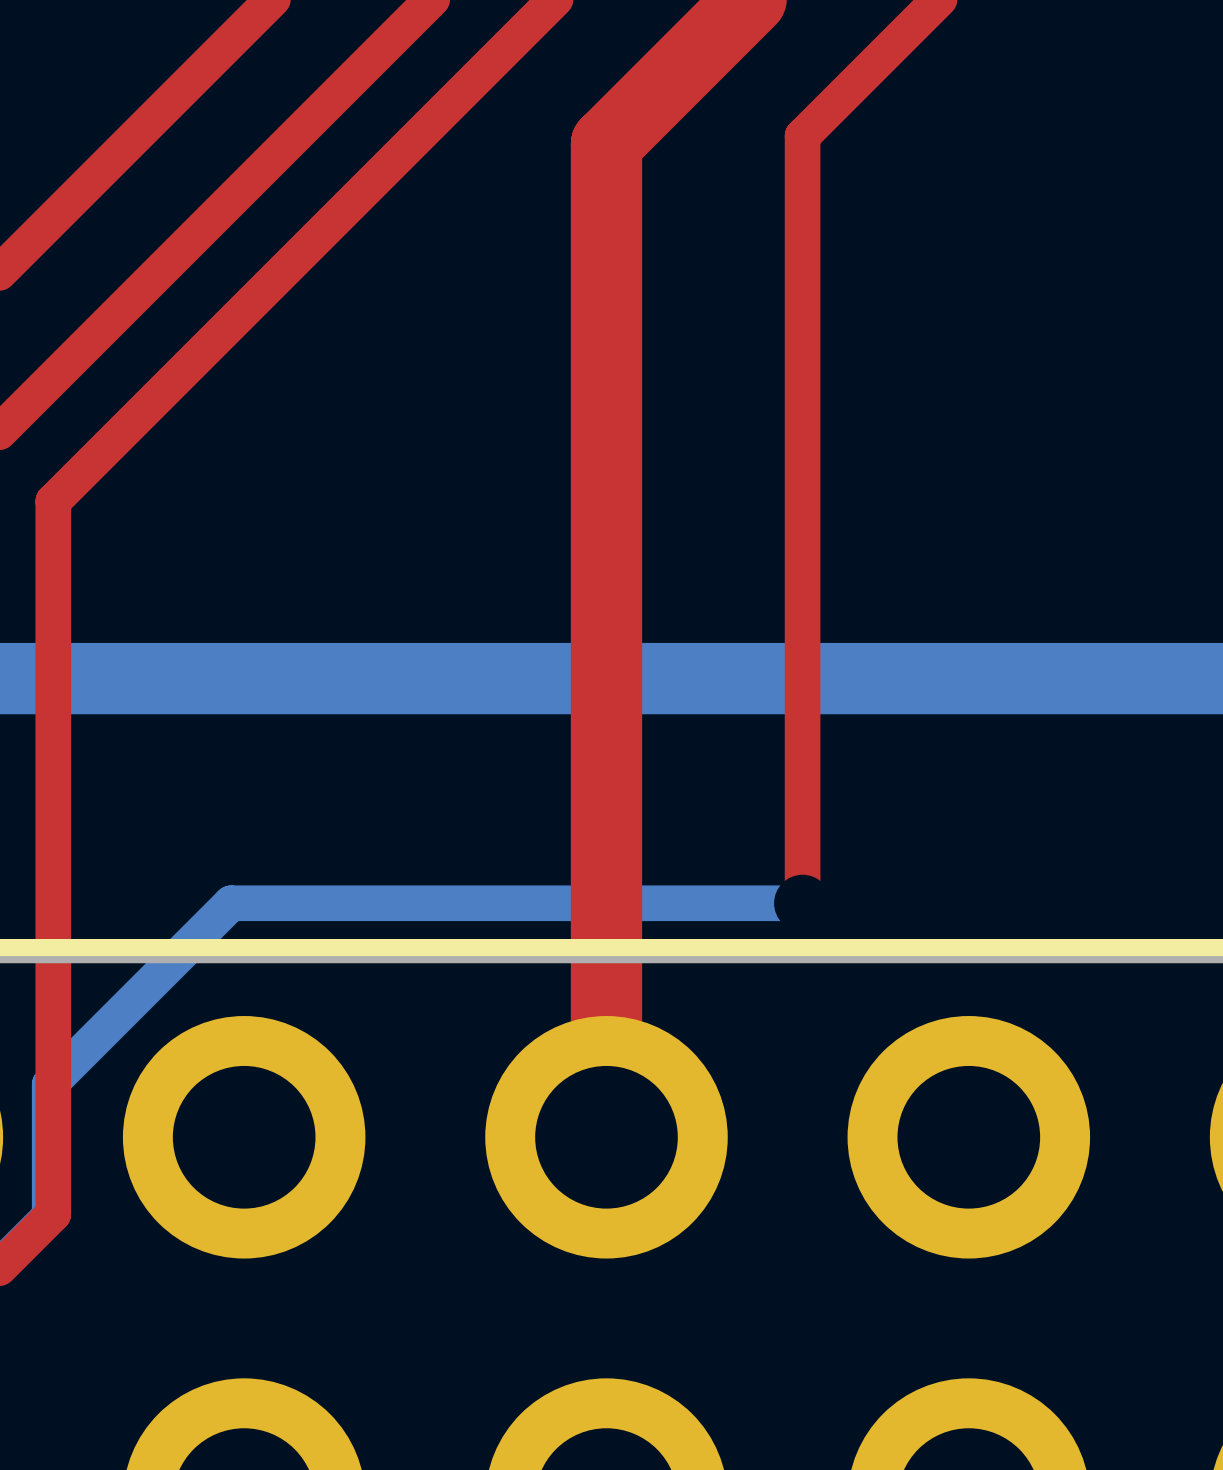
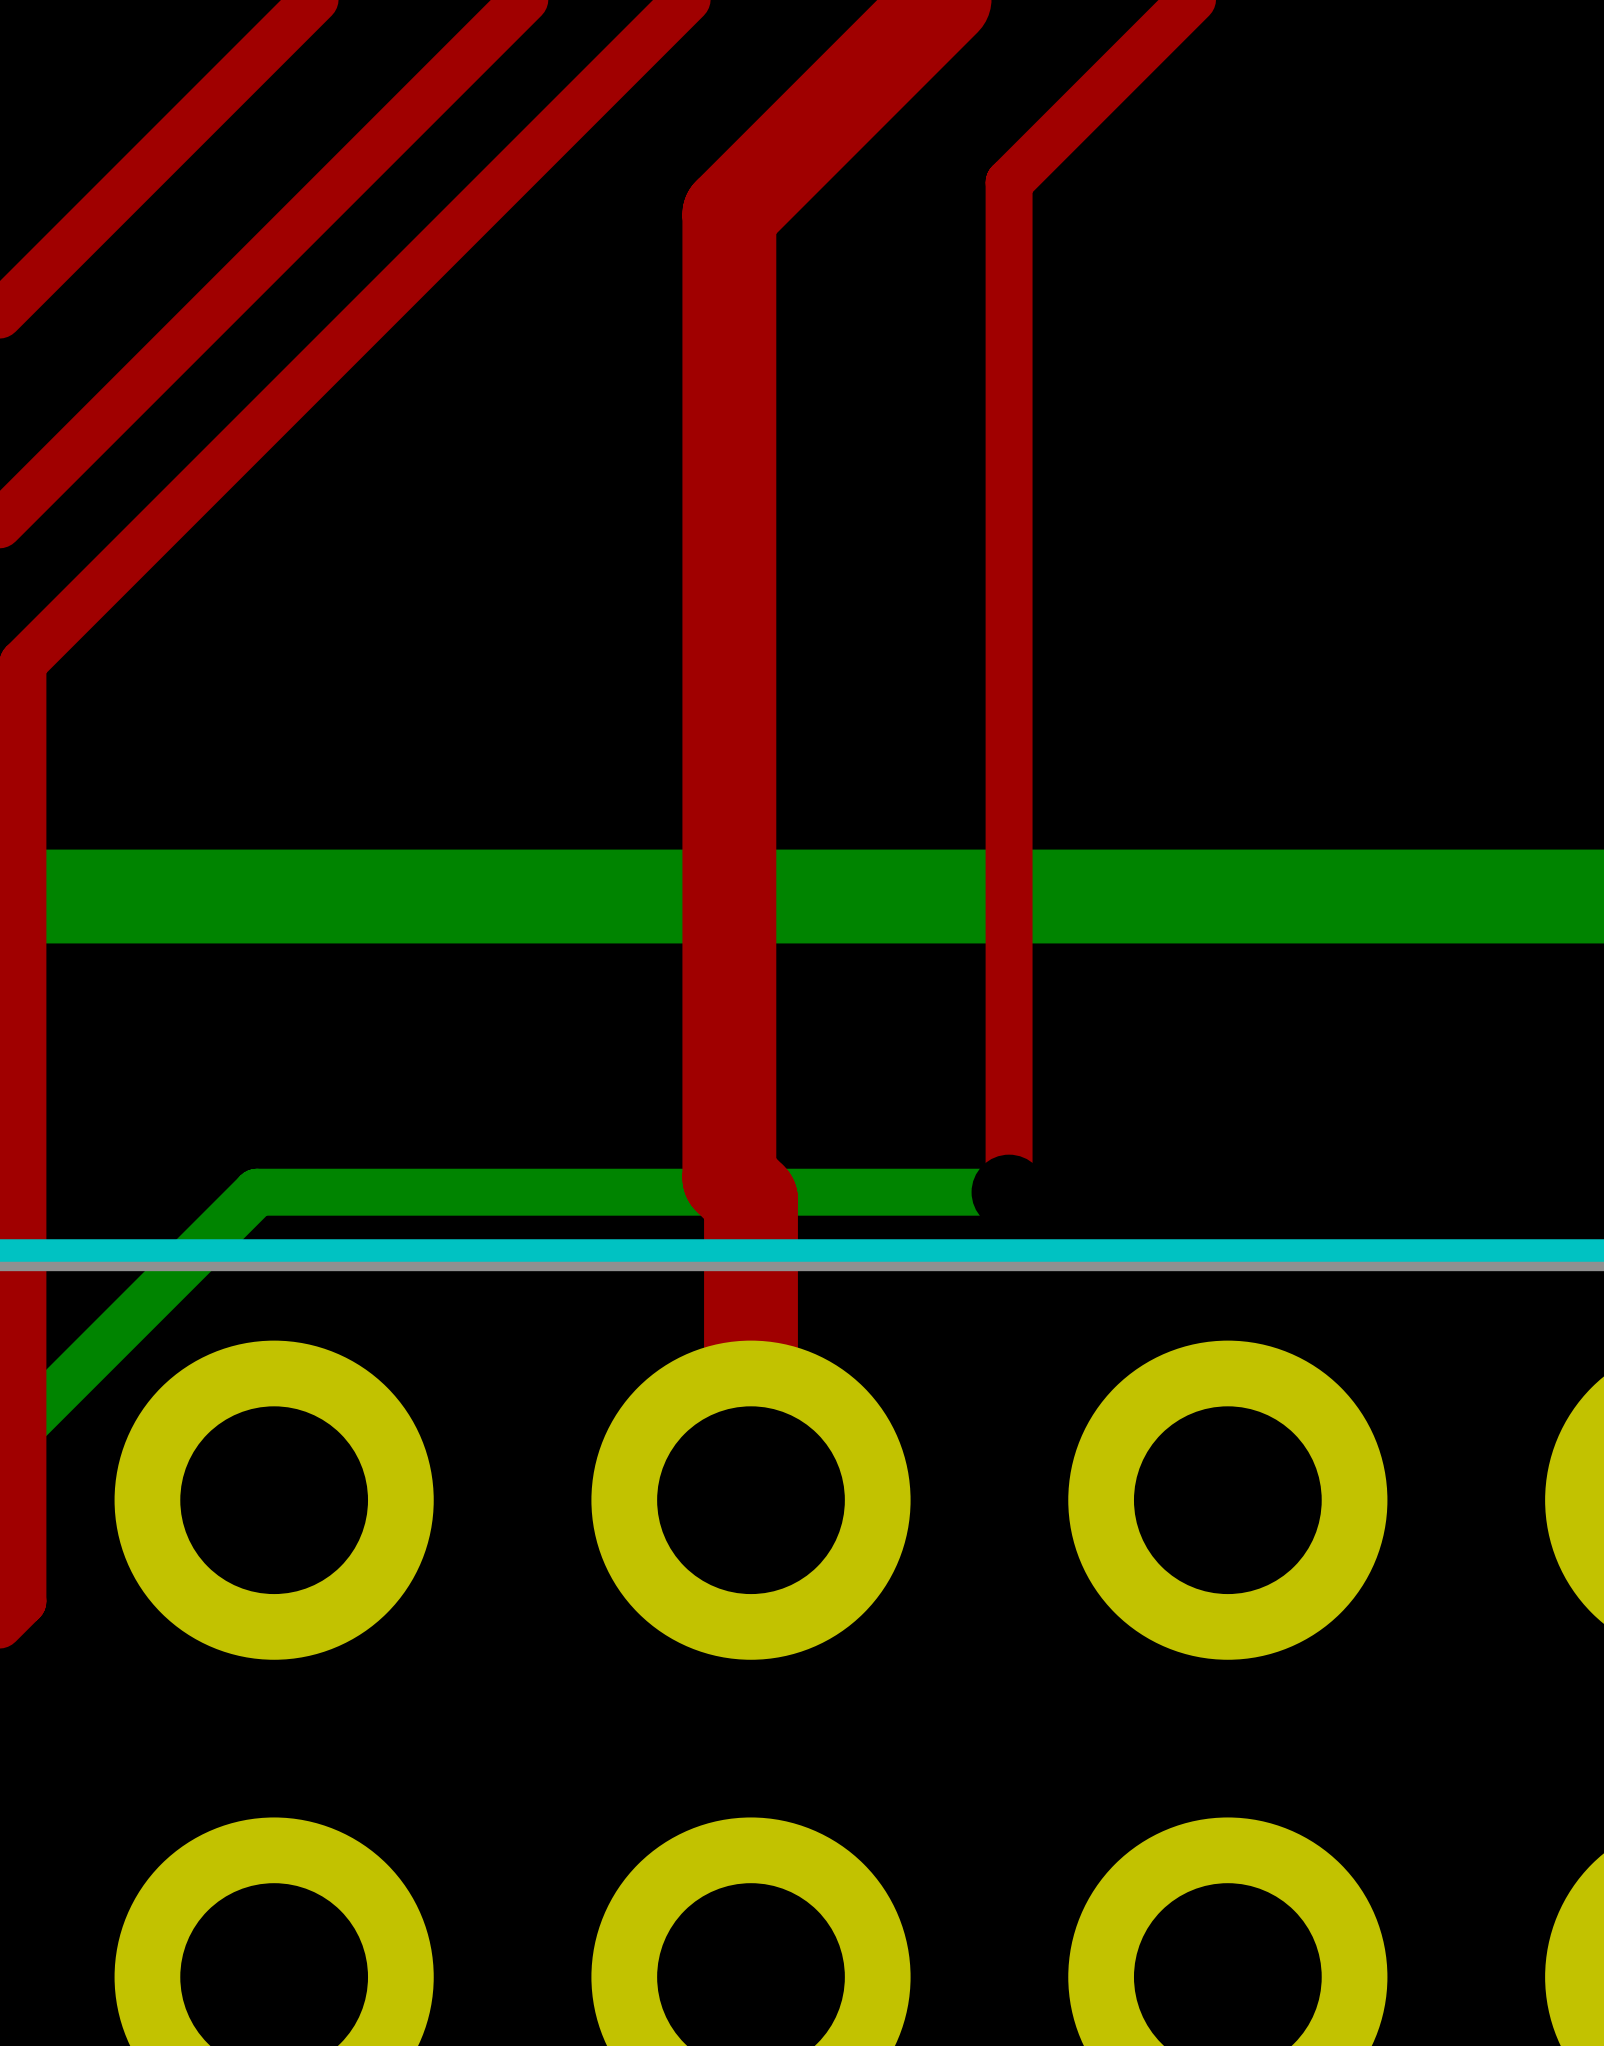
top track: (606, 143) (606, 908) -> (751, 192) (729, 214) (729, 1177) (751, 1199)

